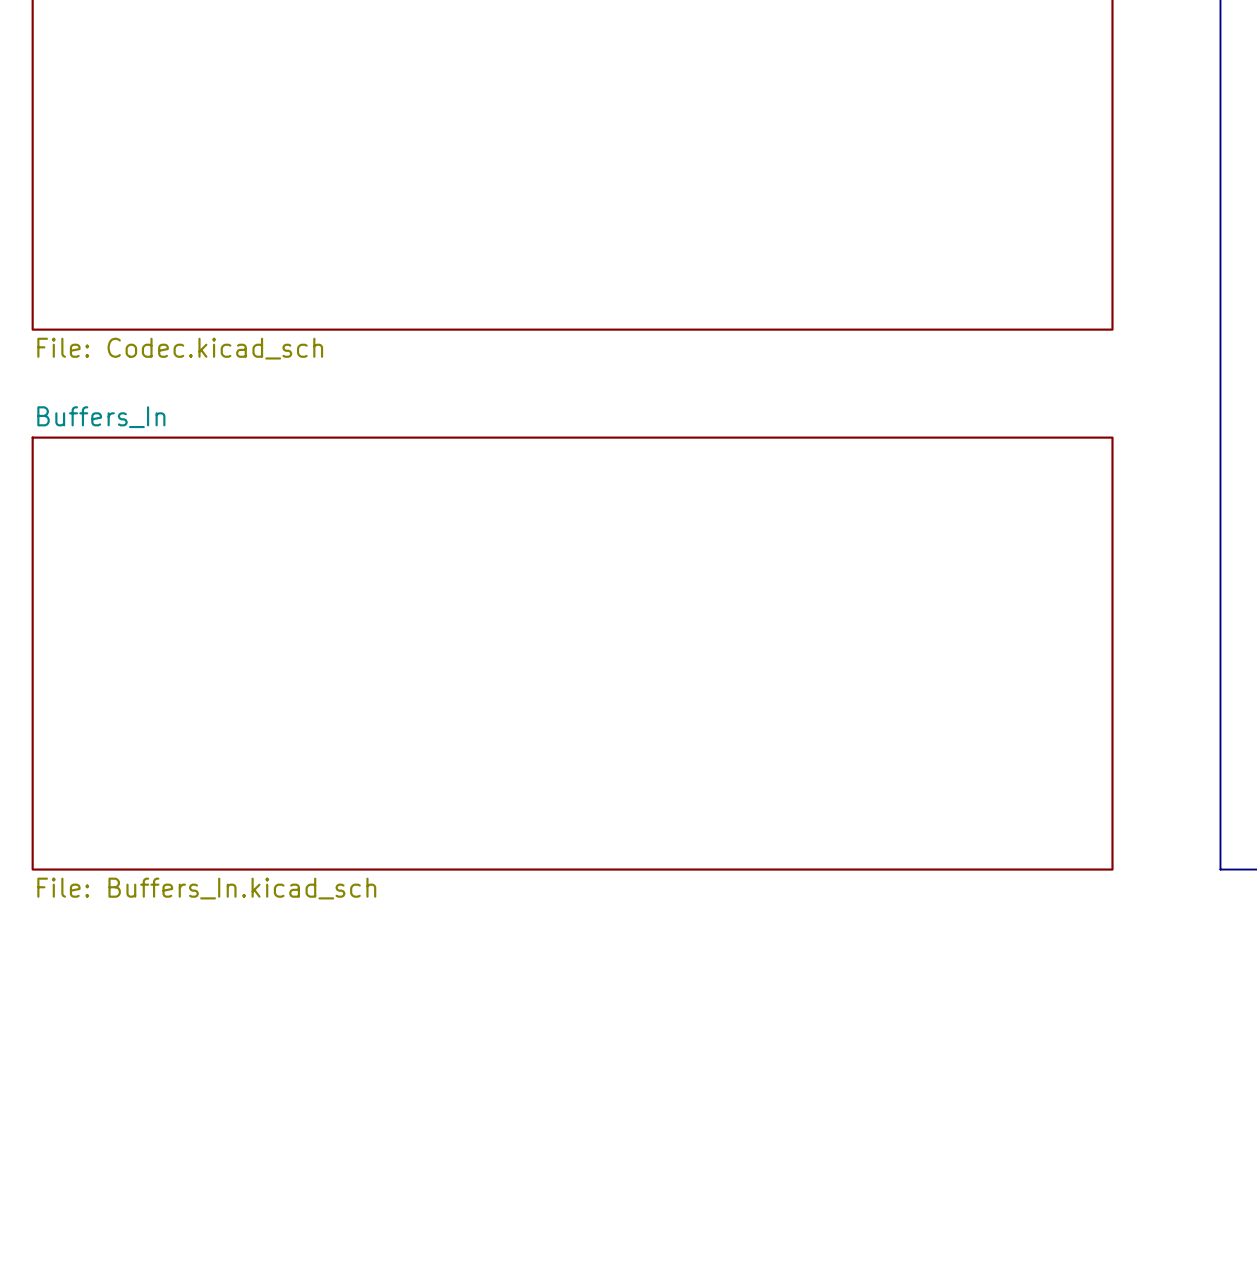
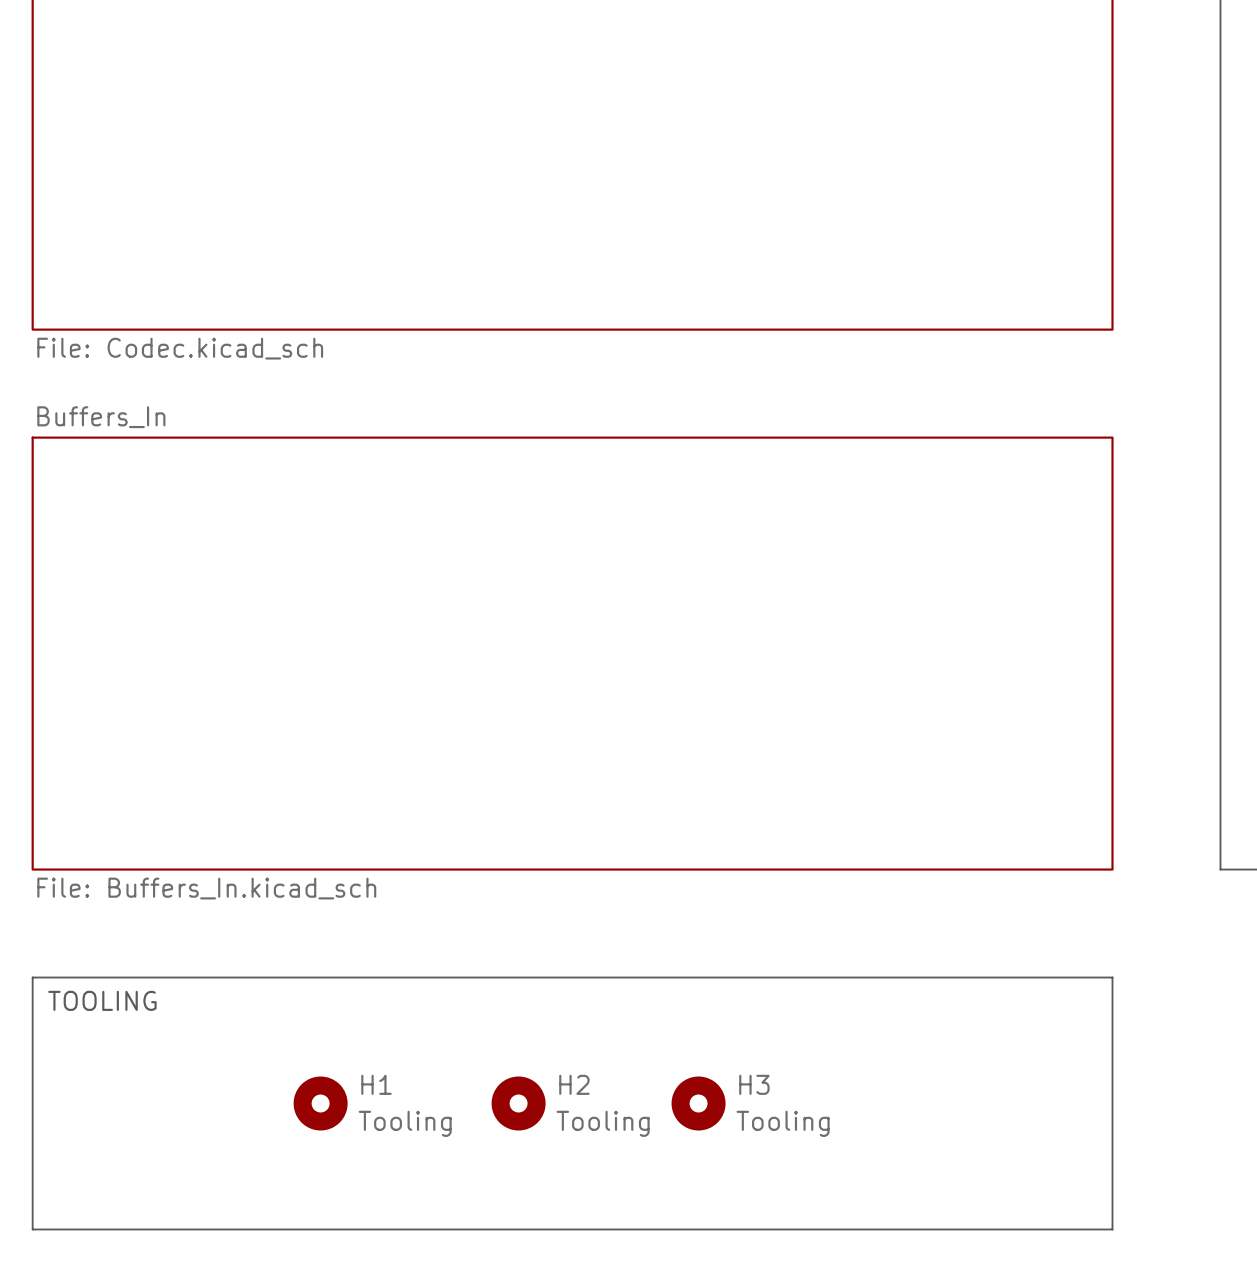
line: none -> (32, 977) (1112, 977) (1112, 1229) (32, 1229) (32, 977)
text: none -> TOOLING (102, 1000)
H1: none -> Tooling (320, 1103)
H2: none -> Tooling (518, 1103)
H3: none -> Tooling (698, 1103)

